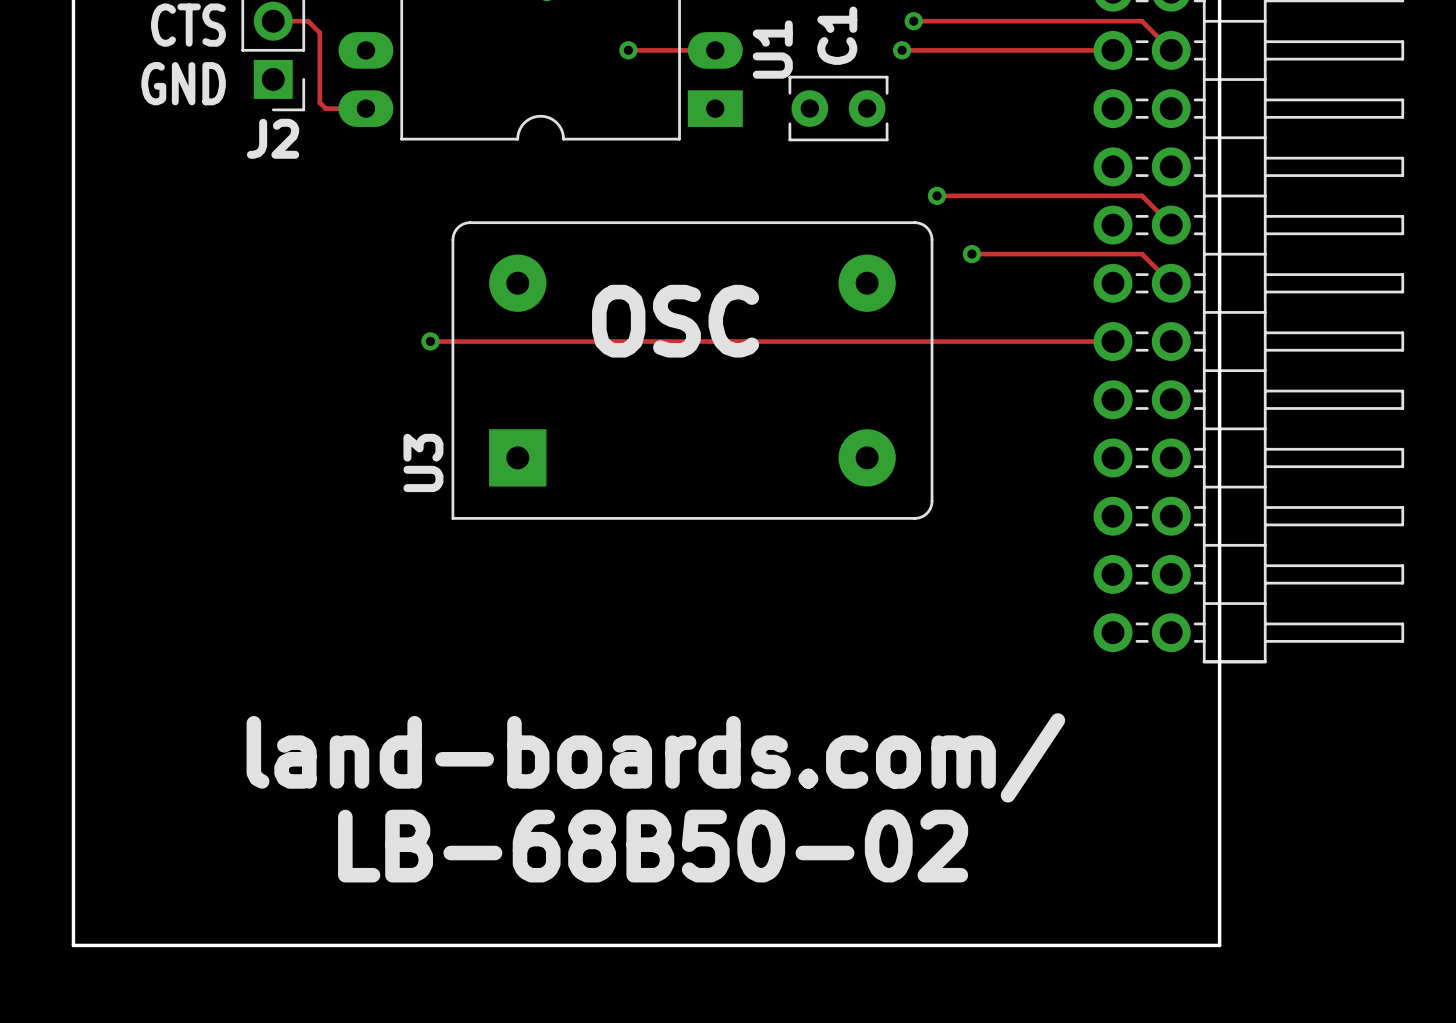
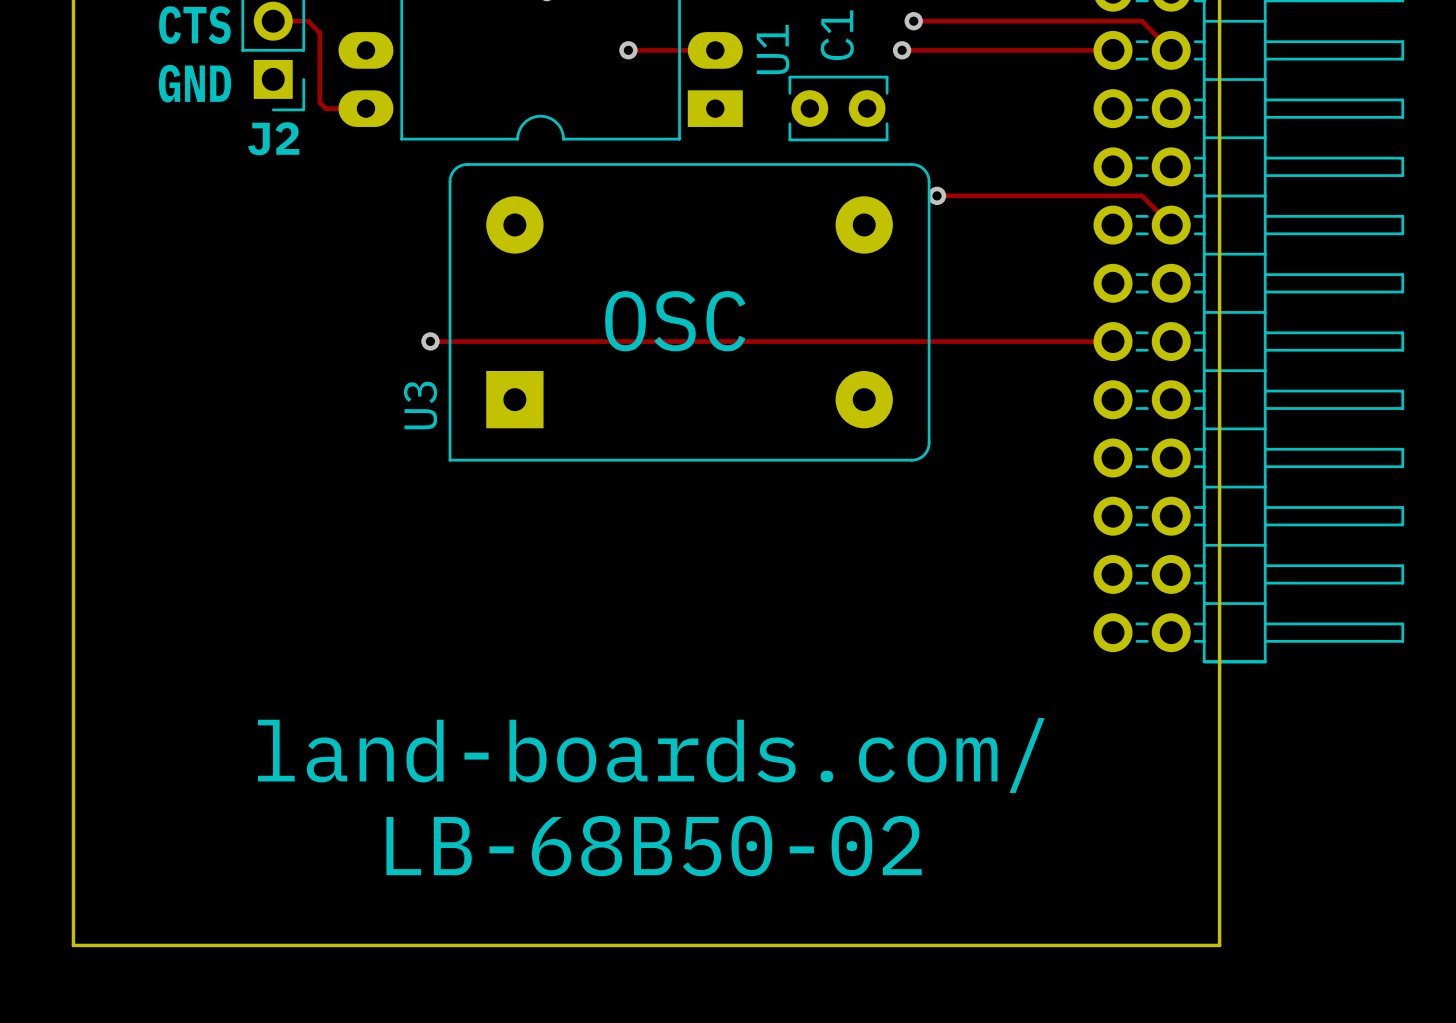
track: (971, 254) (1142, 254) (1171, 283) -> none
via: (971, 254) -> none
U3 position: (692, 370) -> (689, 312)

